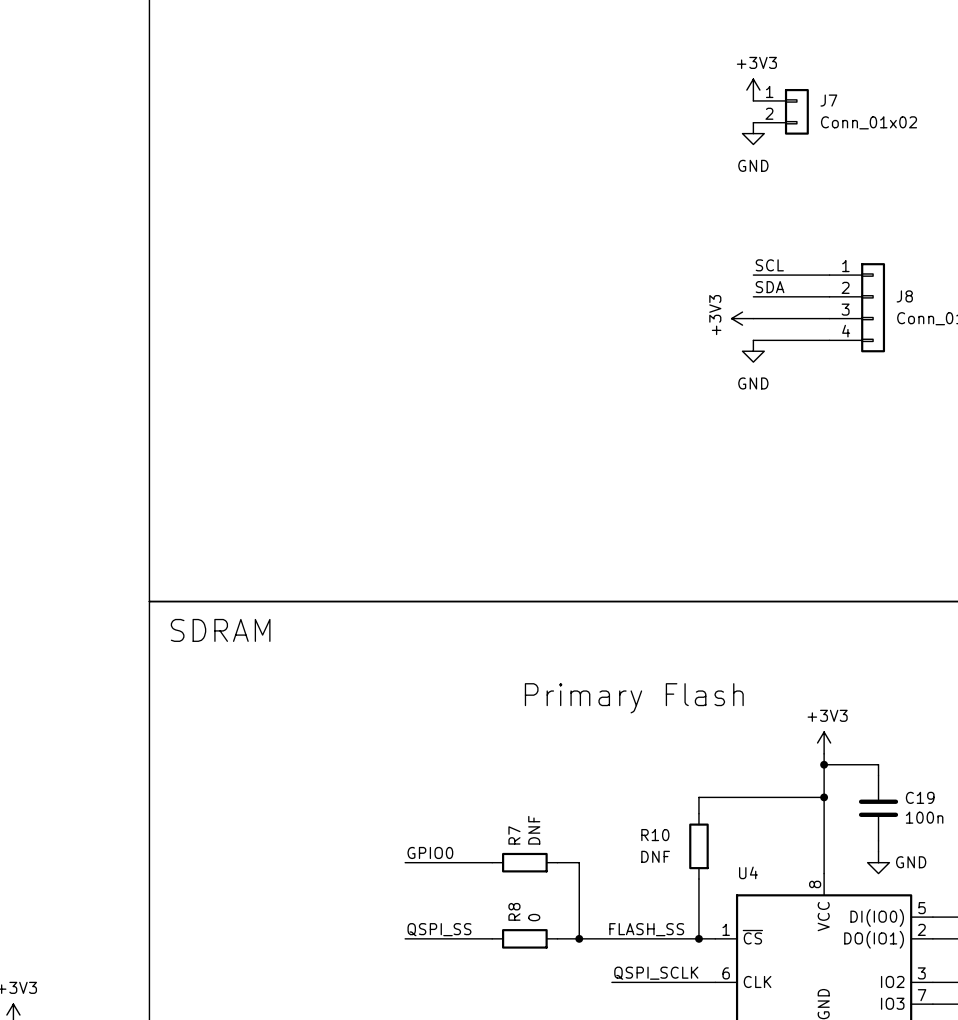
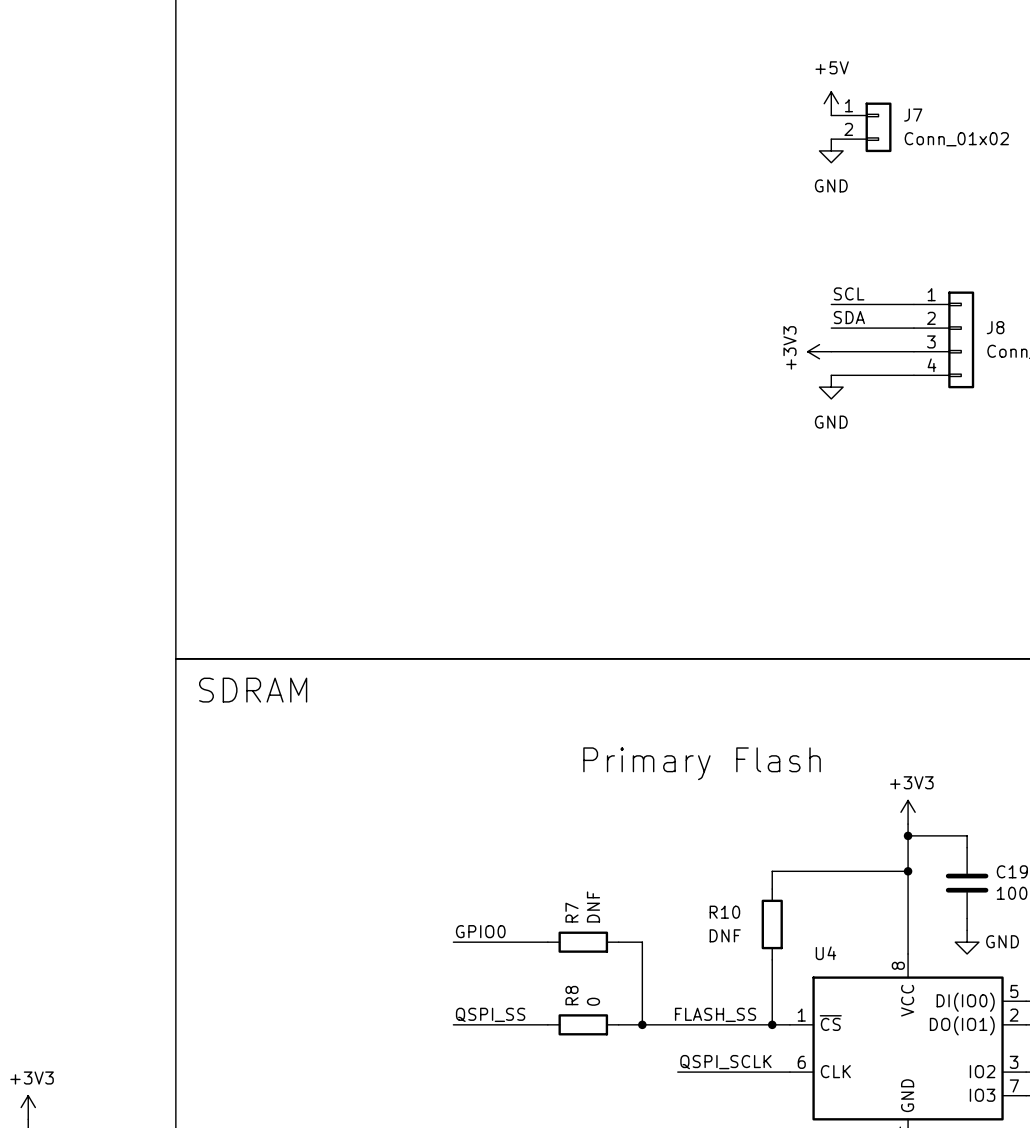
power symbol: +3V3 (753, 90) -> +5V (831, 103)

